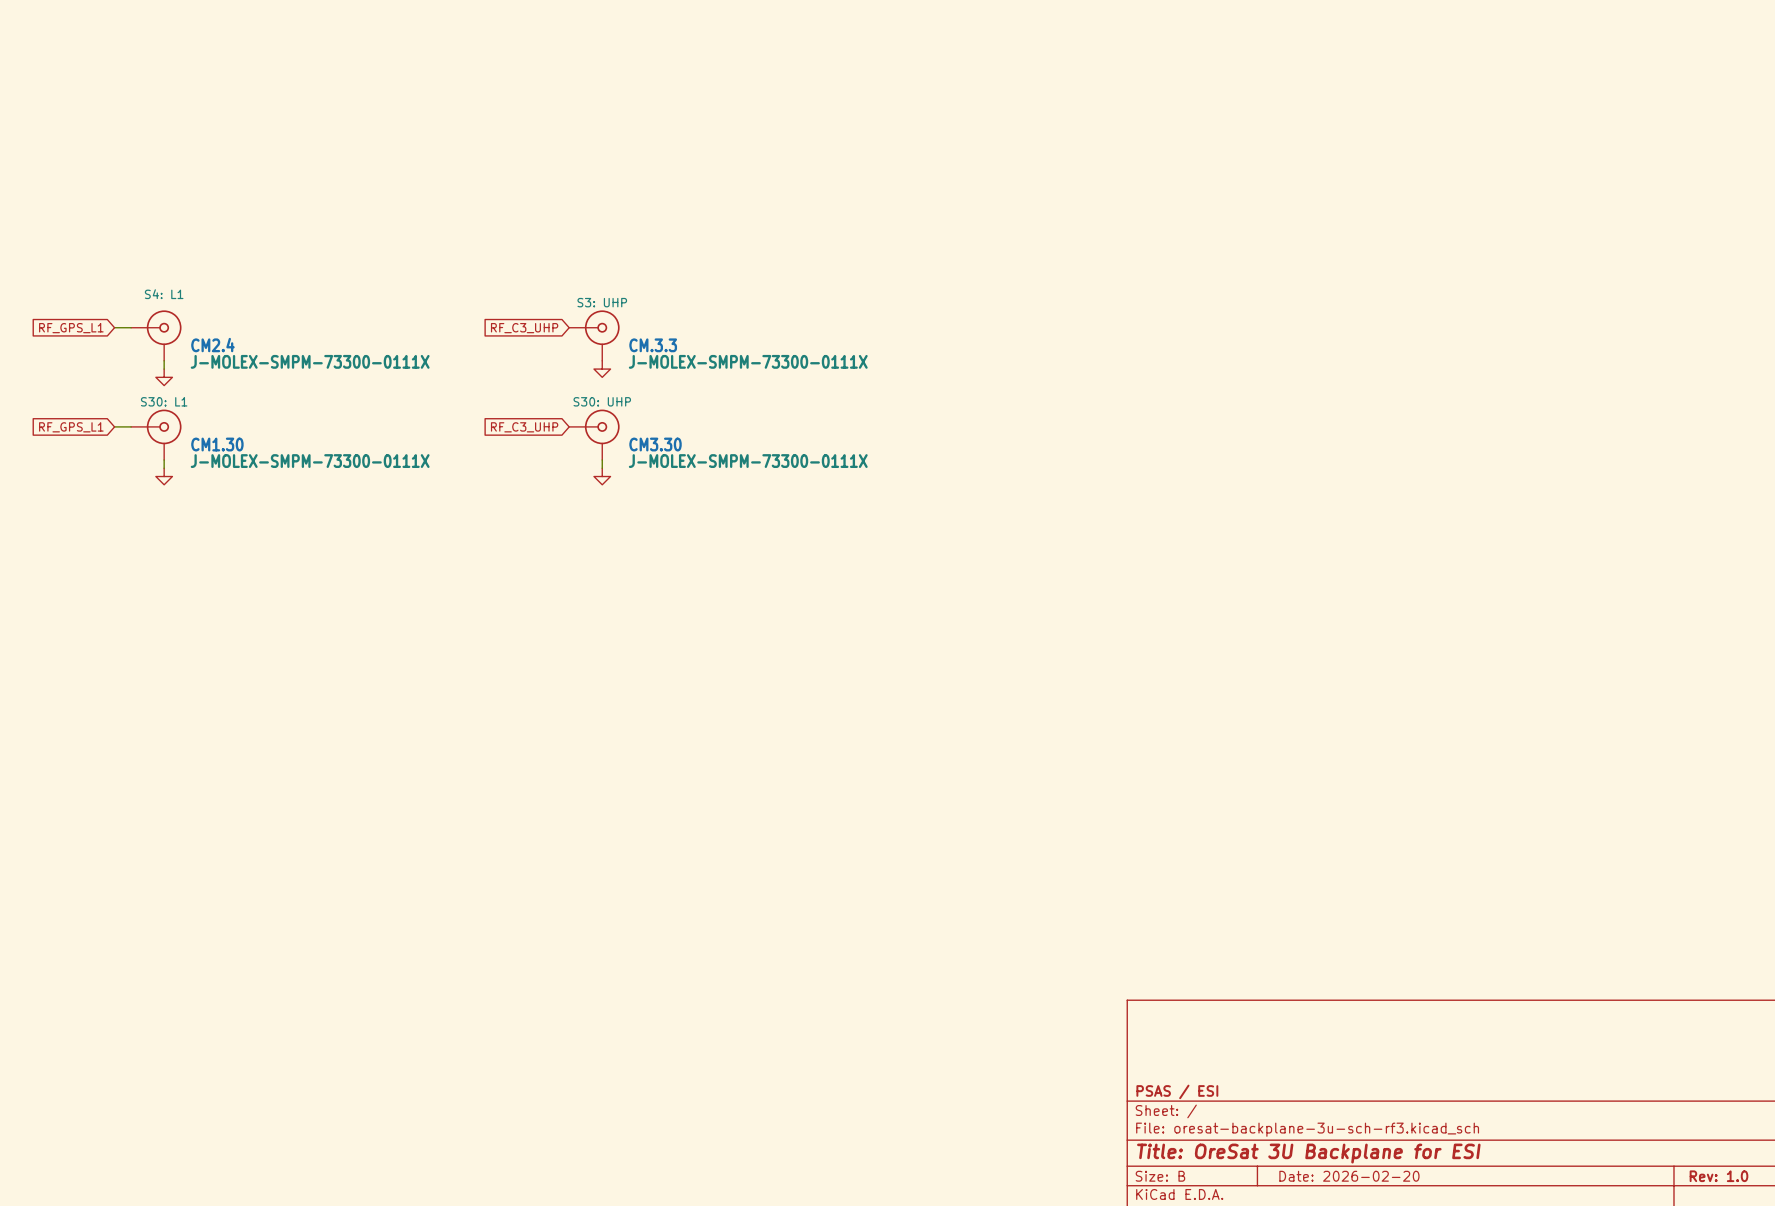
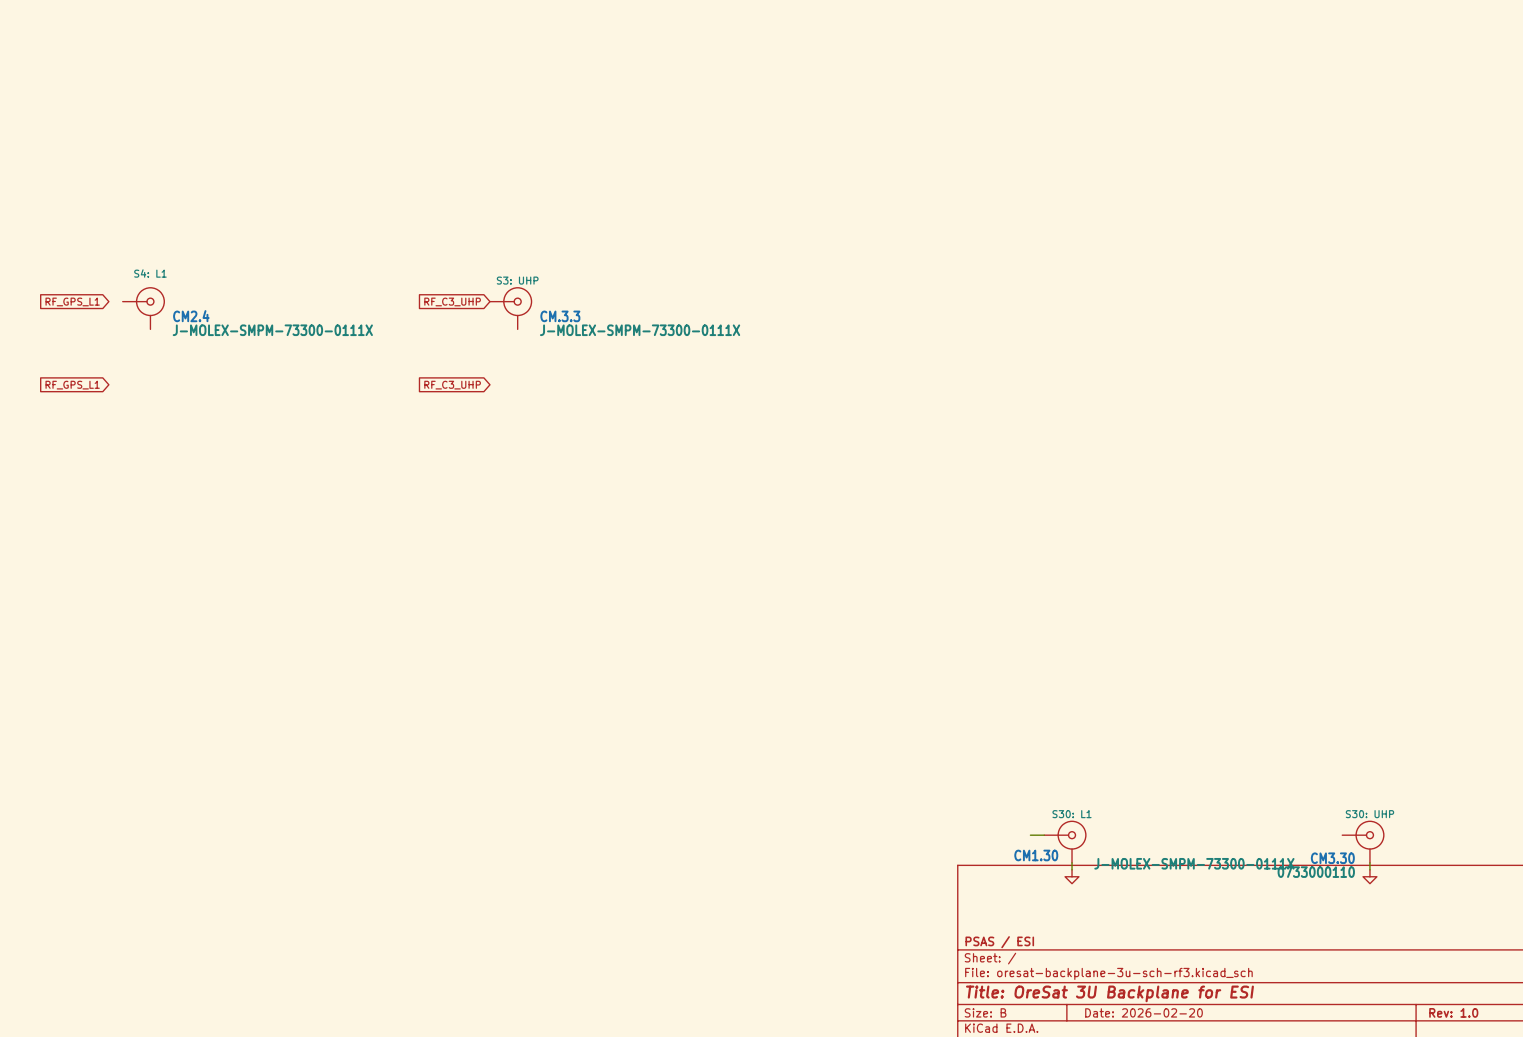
wire: (114, 327) (131, 327) -> none
wire: (164, 360) (164, 369) -> none
power symbol: (602, 369) -> none
power symbol: (164, 377) -> none
wire: (114, 426) (131, 426) -> none
CM1.30 position: (156, 434) -> (1065, 841)
CM3.30 position: (594, 434) -> (1363, 841)
CM1.30 name position: CM1.30 (217, 444) -> CM1.30 (1036, 855)
CM3.30 name position: CM3.30 (655, 444) -> CM3.30 (1332, 858)
wire: (164, 459) (164, 468) -> none
wire: (602, 459) (602, 468) -> none
CM3.30 value: J-MOLEX-SMPM-73300-0111X (748, 461) -> 0733000110 (1316, 872)
power symbol: (164, 476) -> none
power symbol: (602, 476) -> none
wire: none -> (1030, 835) (1044, 835)
wire: none -> (1072, 862) (1072, 869)
wire: none -> (1369, 862) (1369, 869)
power symbol: none -> (1072, 876)
power symbol: none -> (1369, 876)

